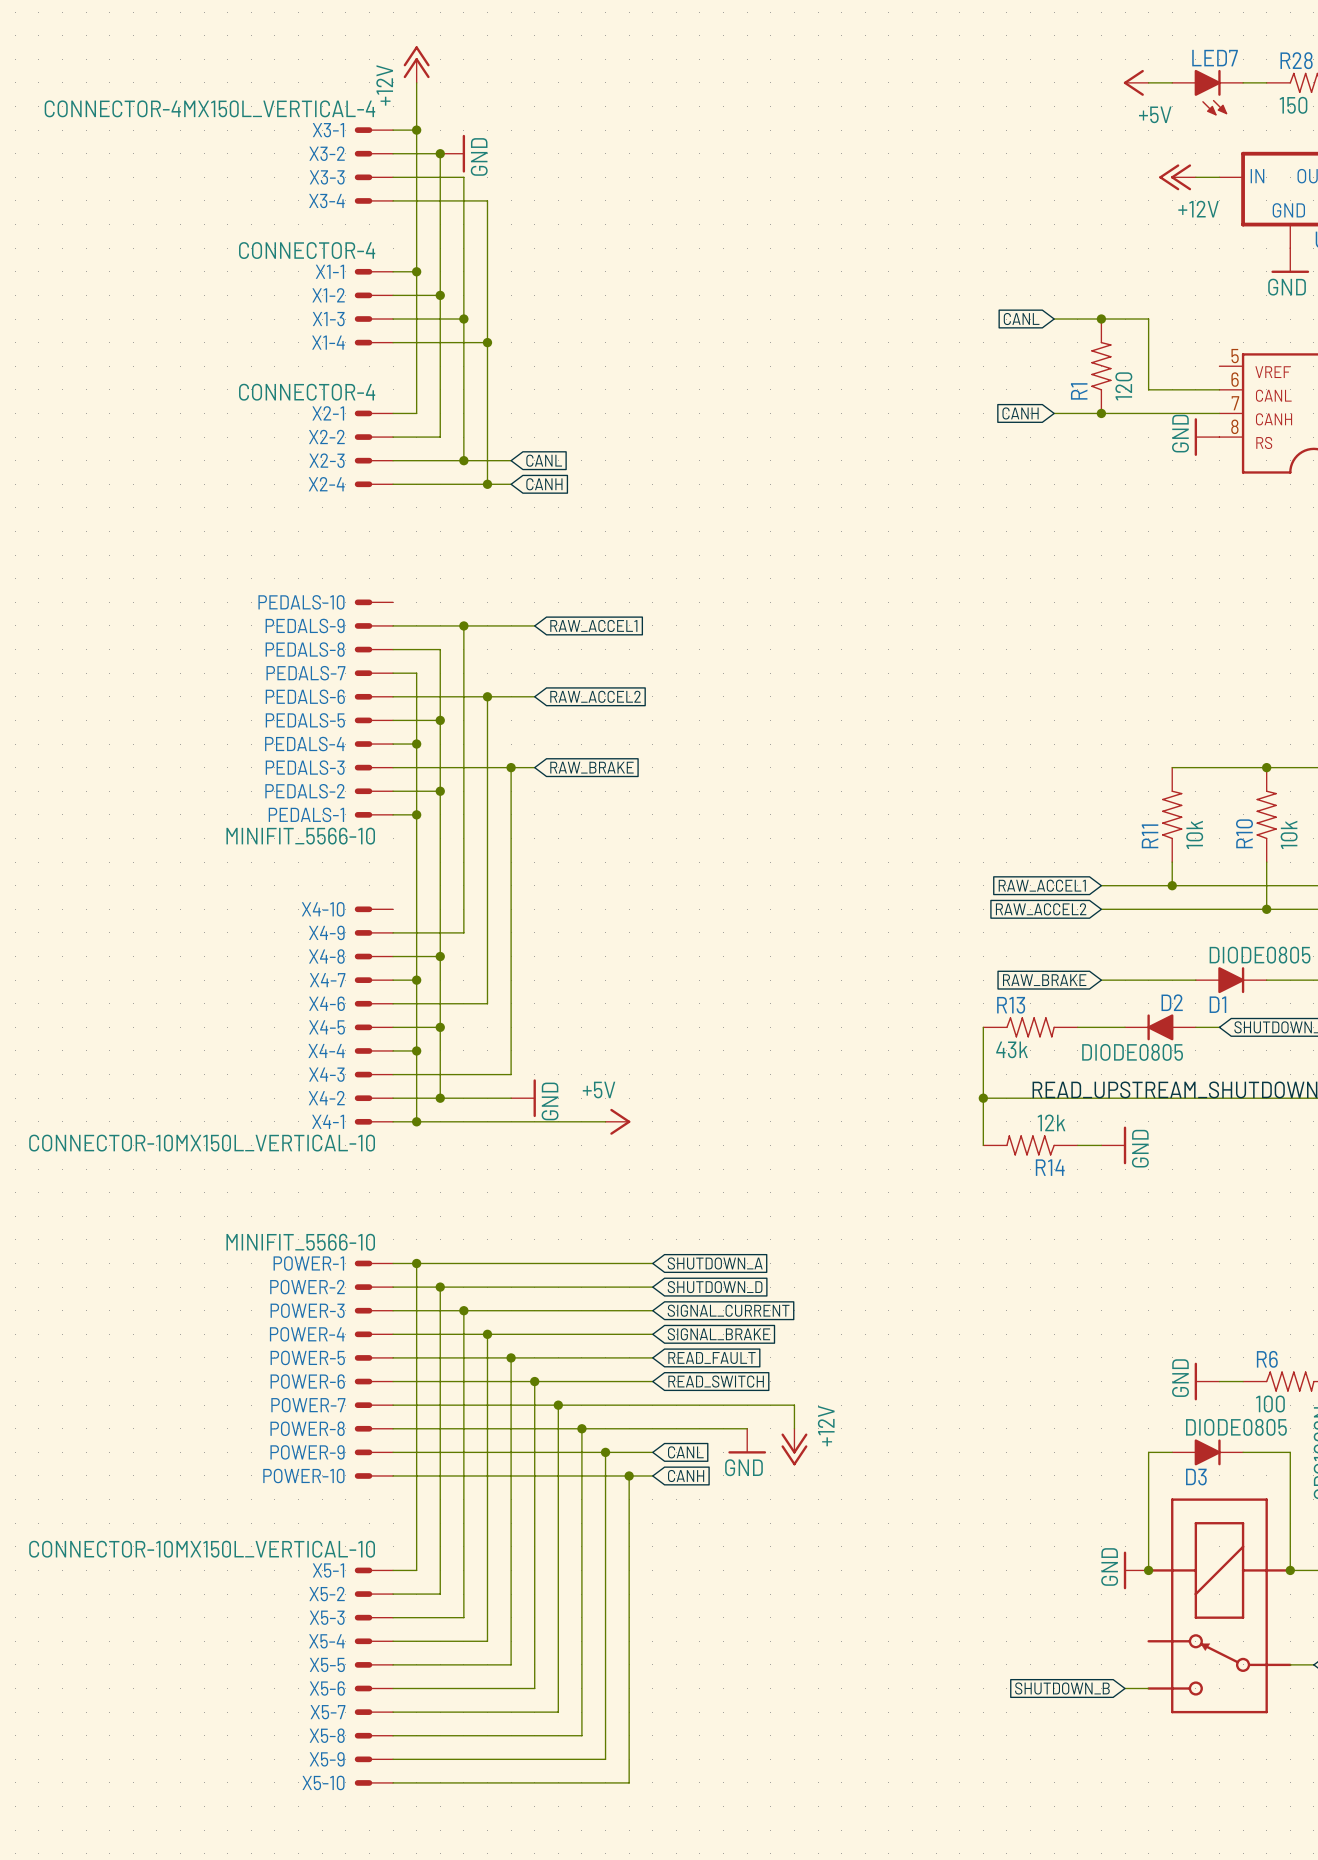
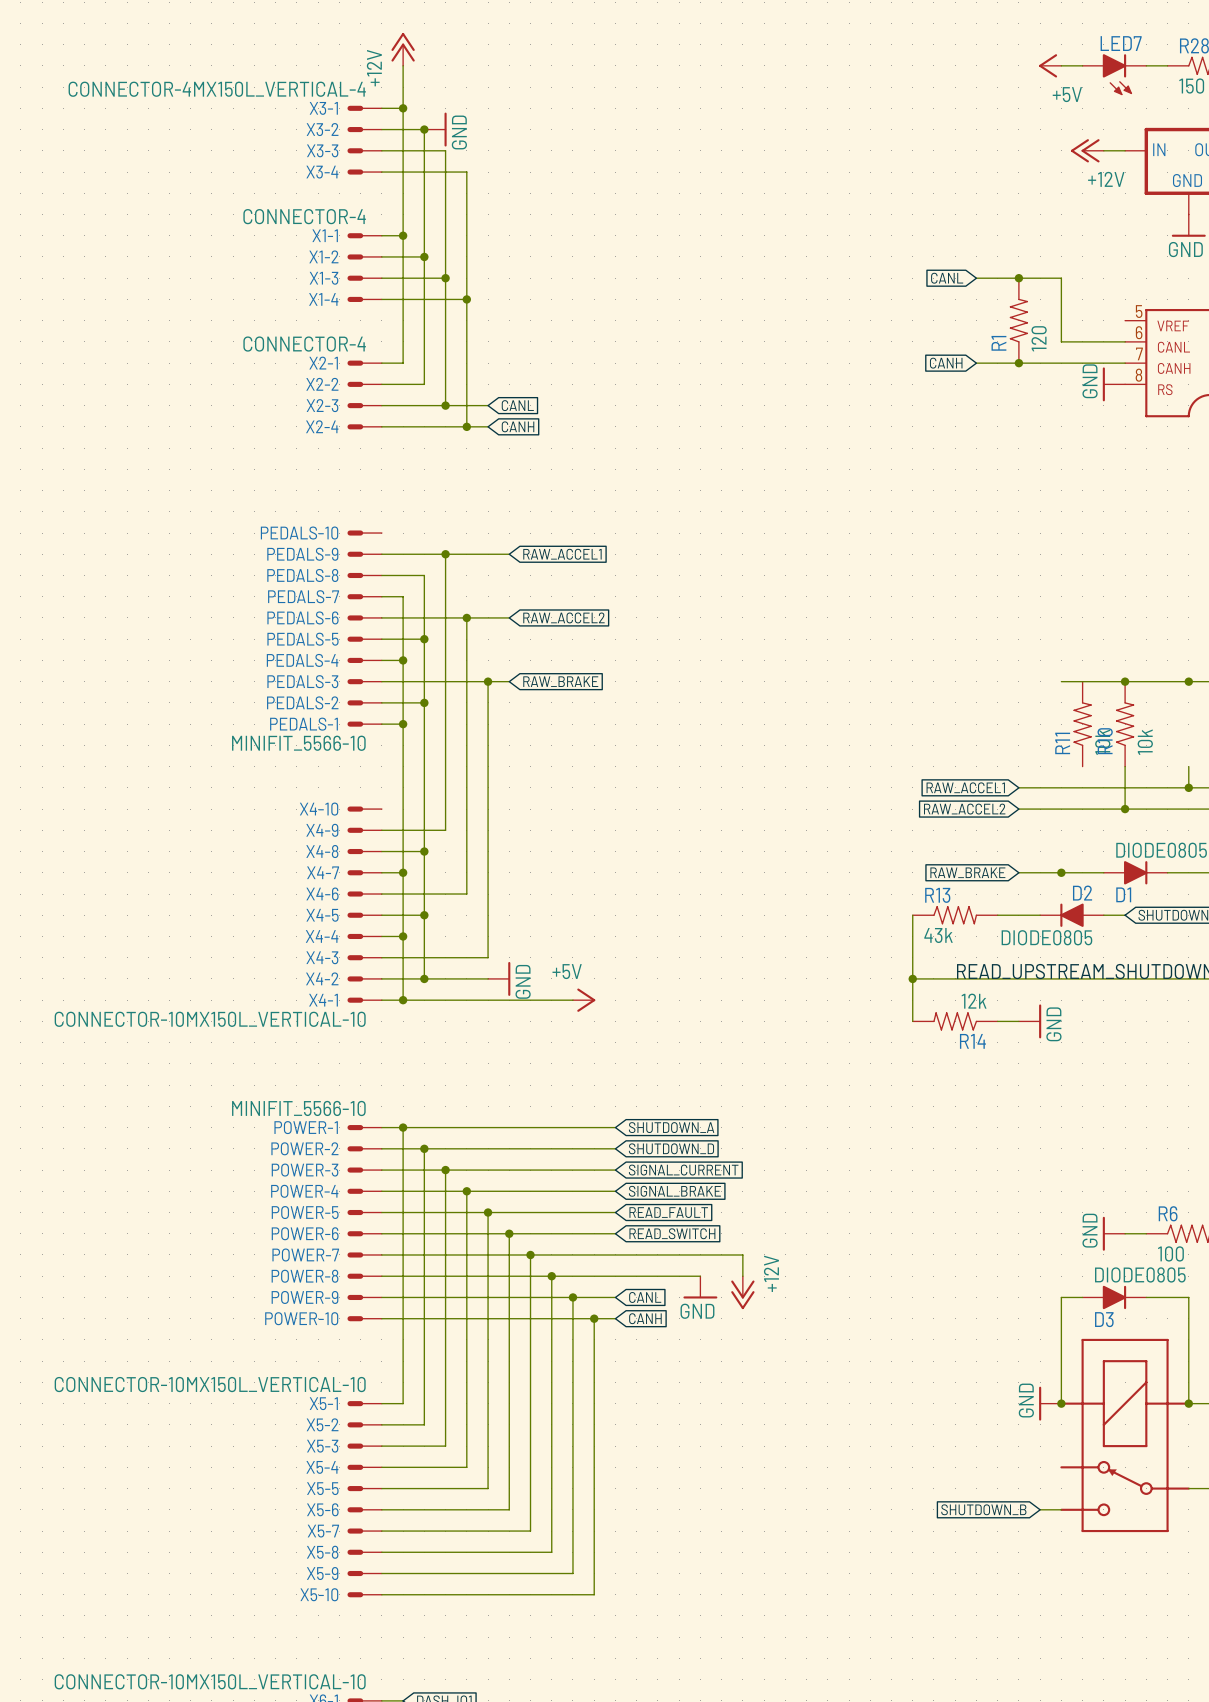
wire: none -> (1061, 681) (1082, 681)
junction: none -> (1125, 681)
junction: (1266, 767) -> none
junction: none -> (1188, 681)
R10 position: (1266, 814) -> (1125, 724)
wire: (1172, 862) (1172, 885) -> (1188, 766) (1188, 787)
wire: (1266, 862) (1266, 909) -> (1125, 766) (1125, 809)
junction: (1172, 885) -> none
junction: none -> (1188, 787)
junction: none -> (1125, 809)
junction: (1266, 909) -> none
junction: none -> (1061, 872)

